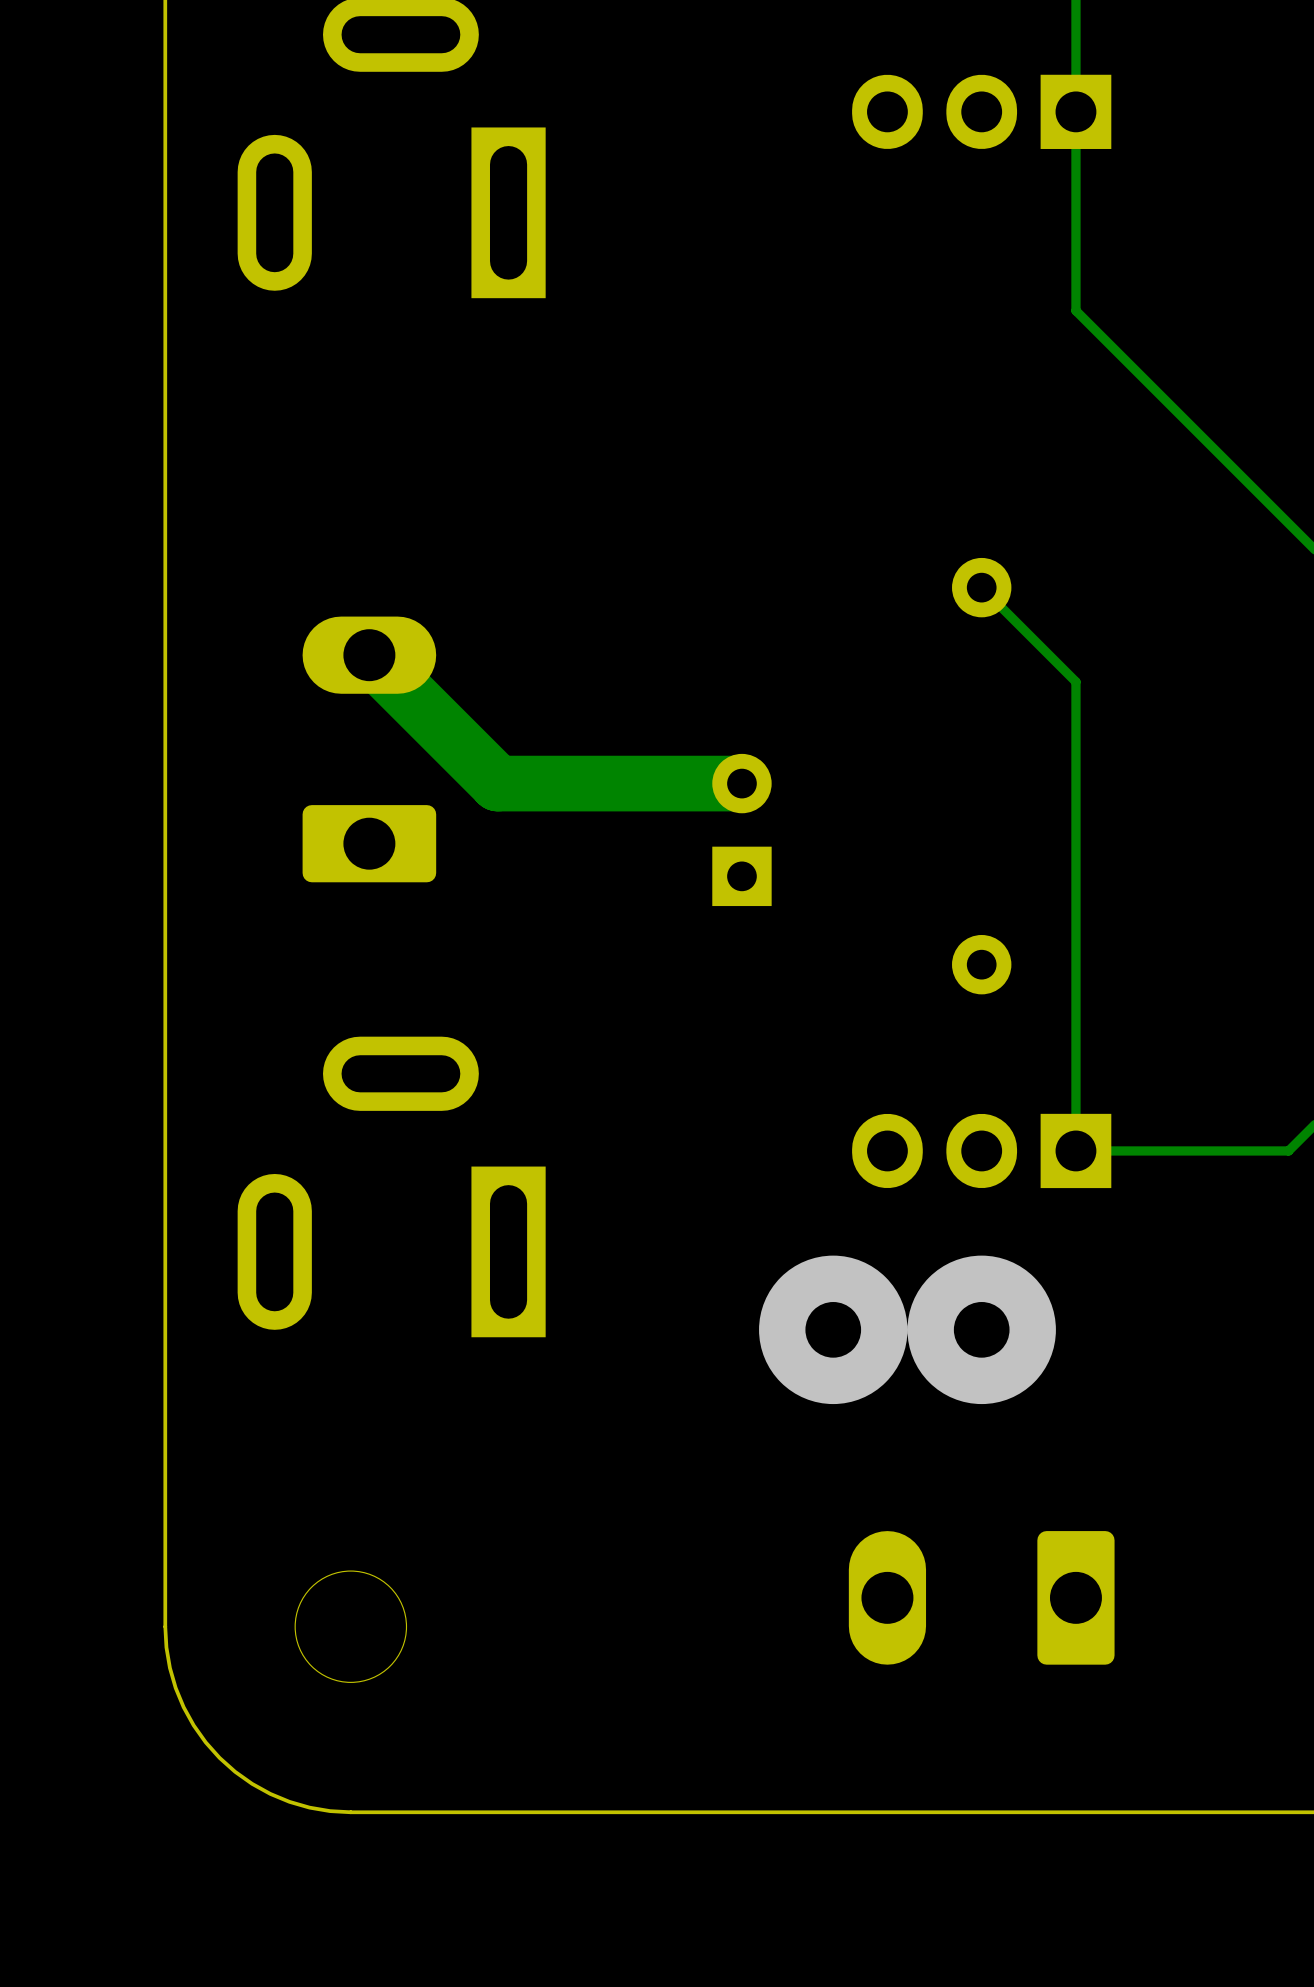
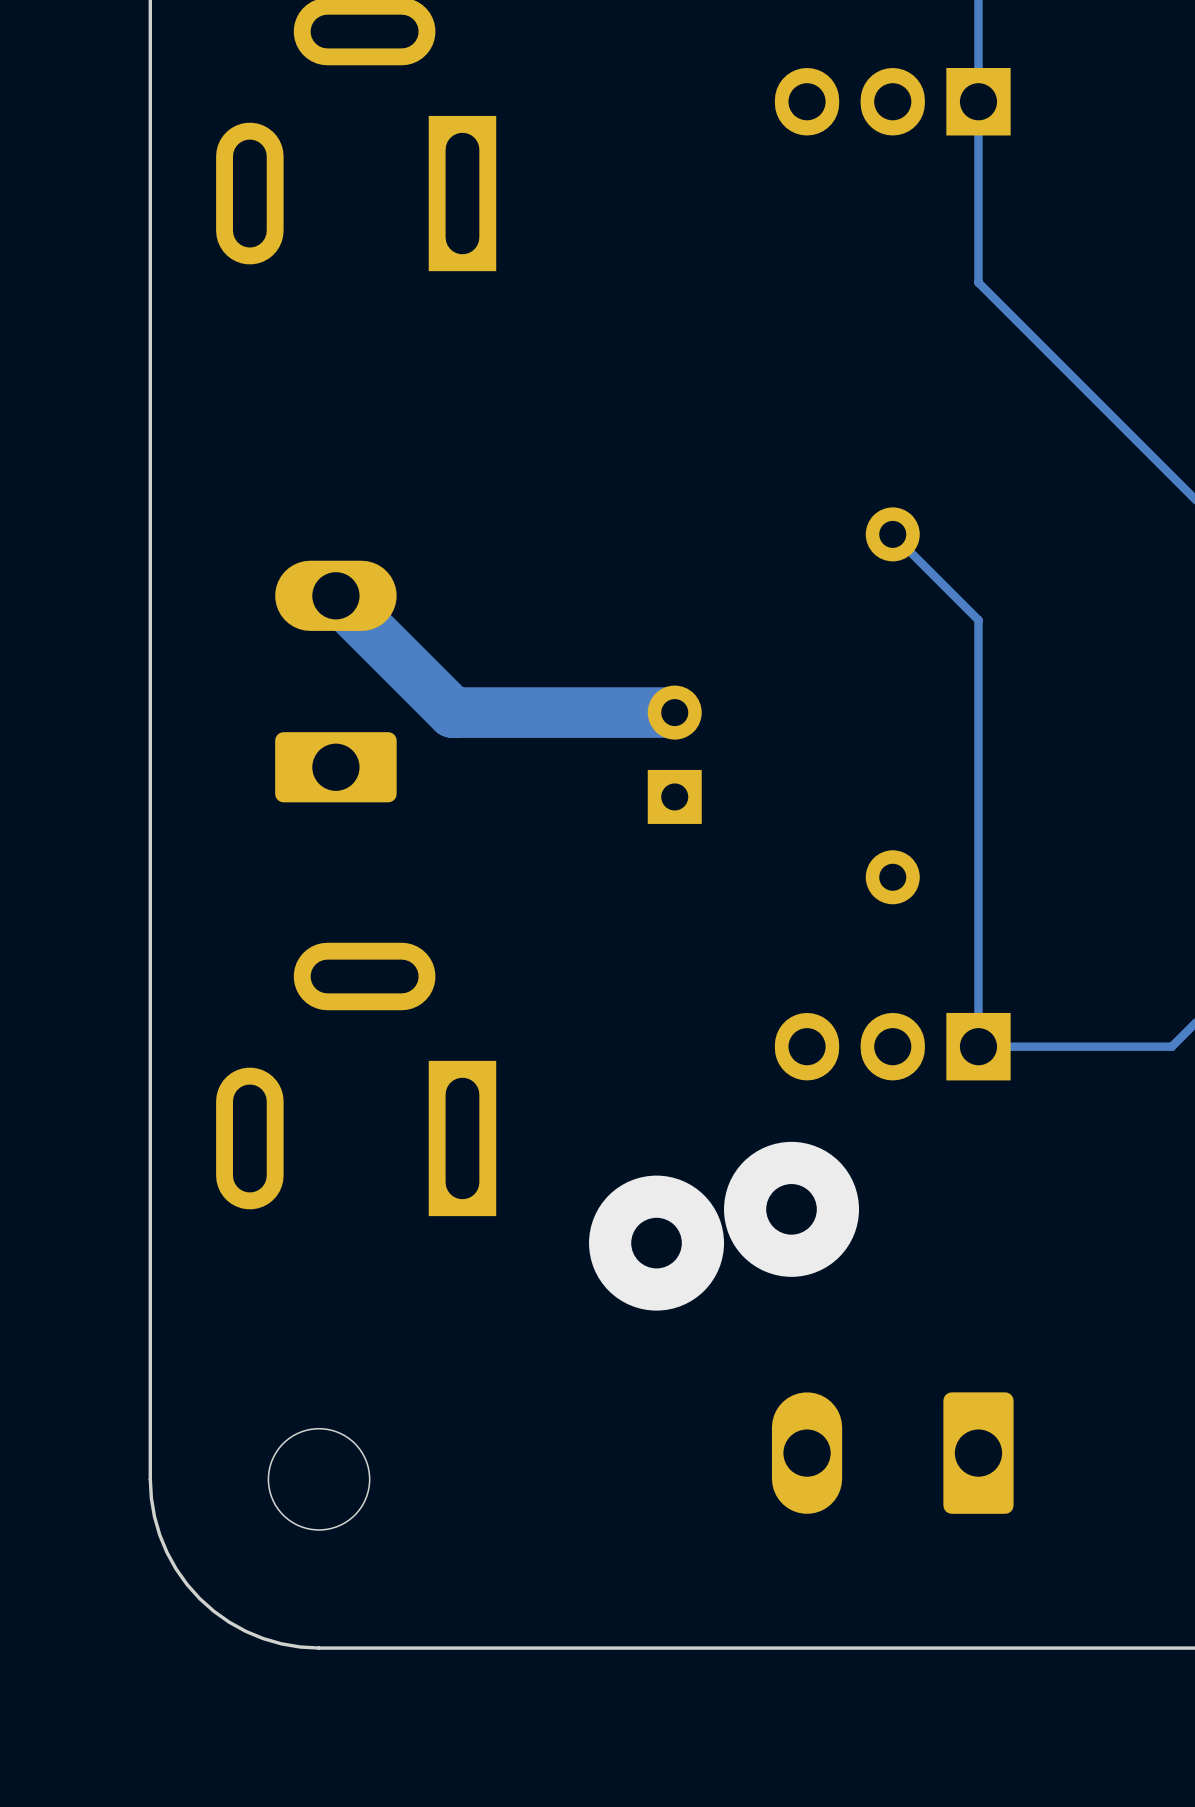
via position: (833, 1329) -> (791, 1209)
via: (981, 1329) -> none
via: none -> (656, 1243)

